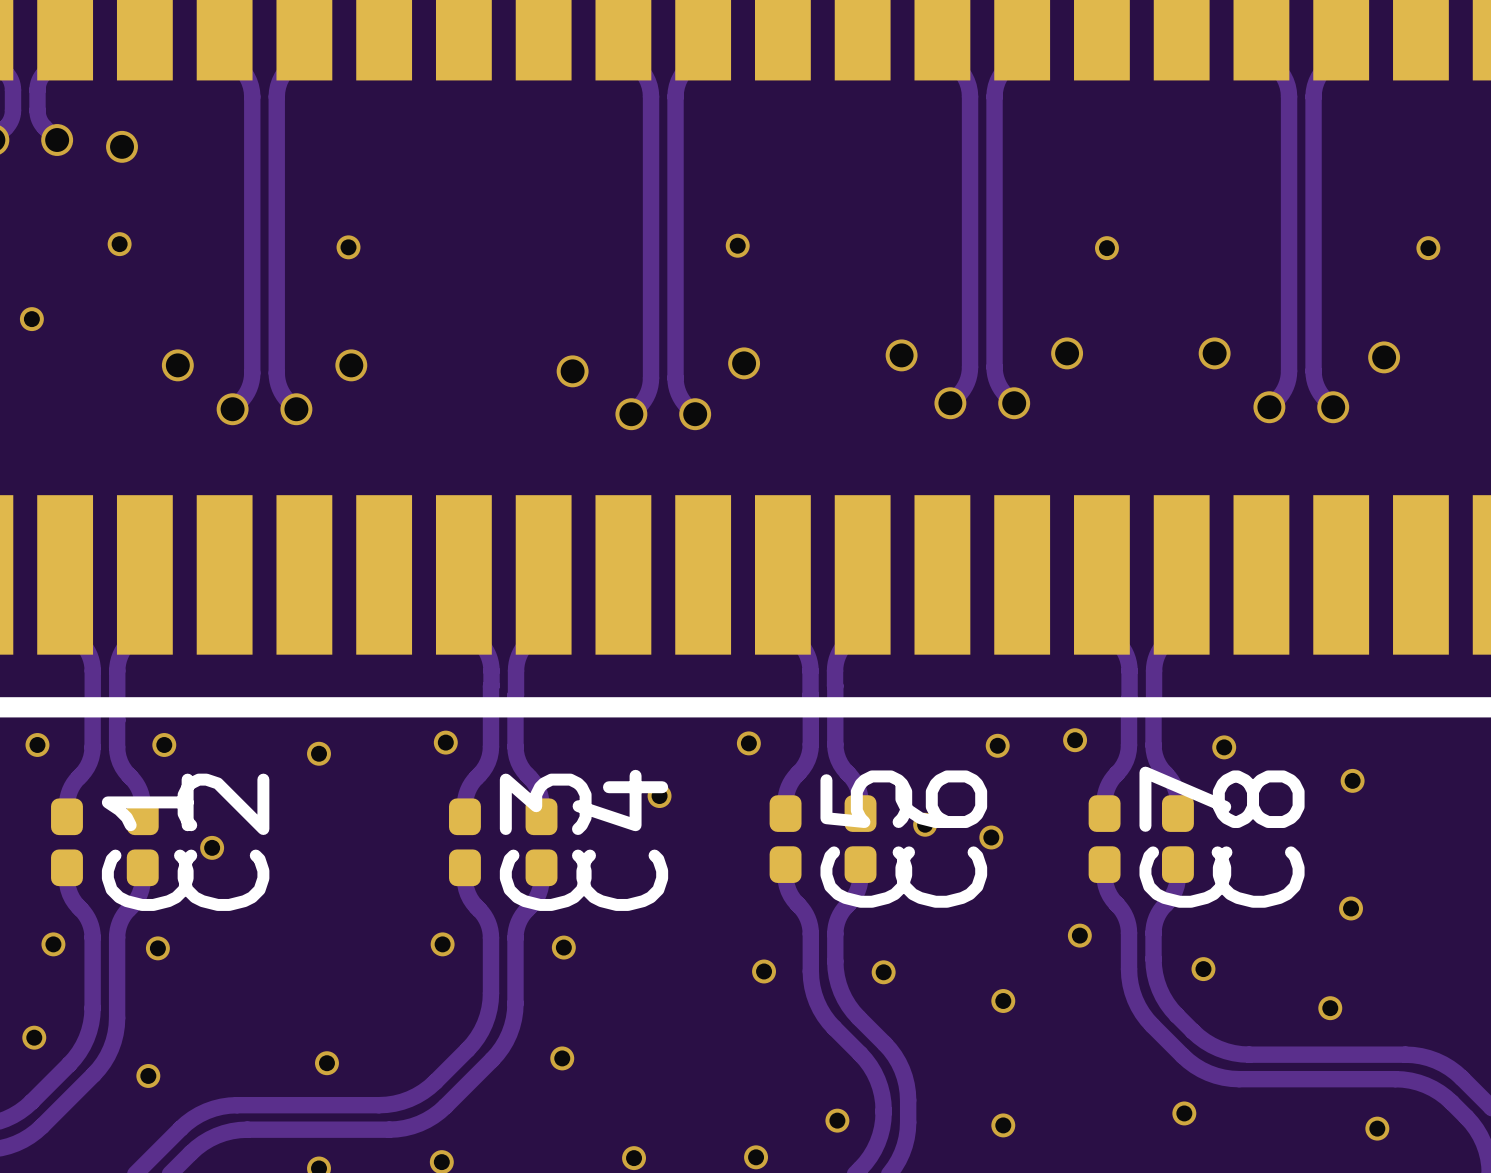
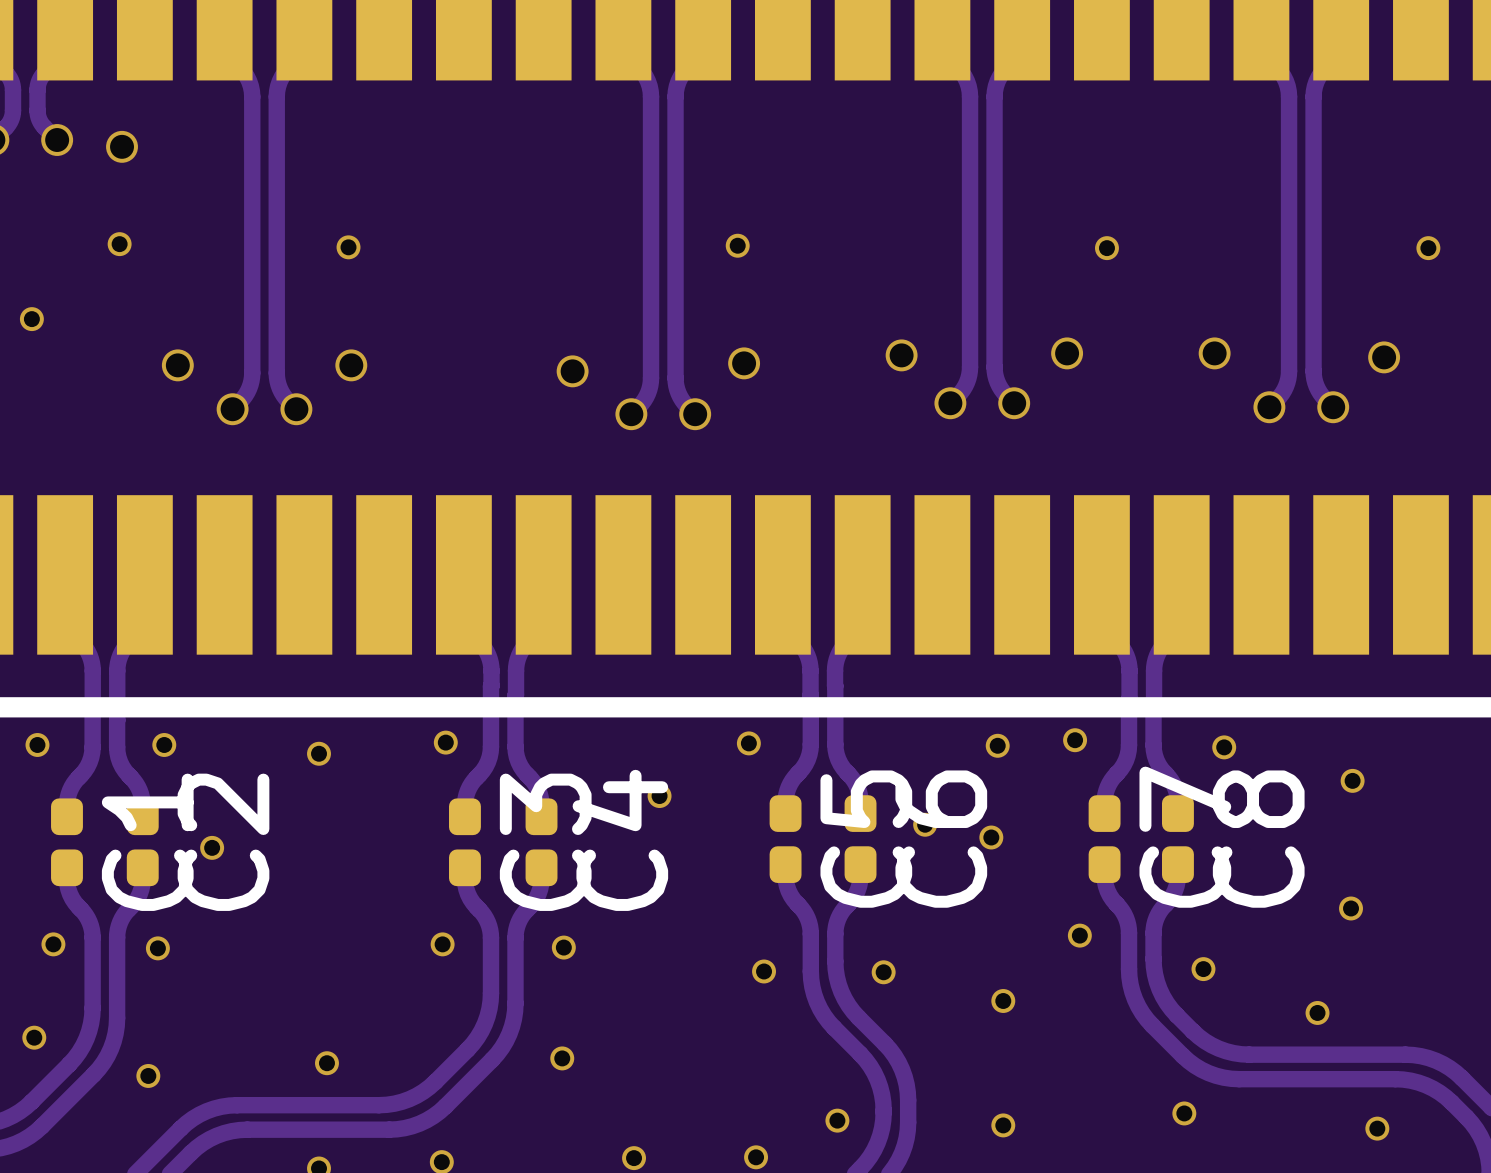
via position: (1330, 1008) -> (1317, 1012)

